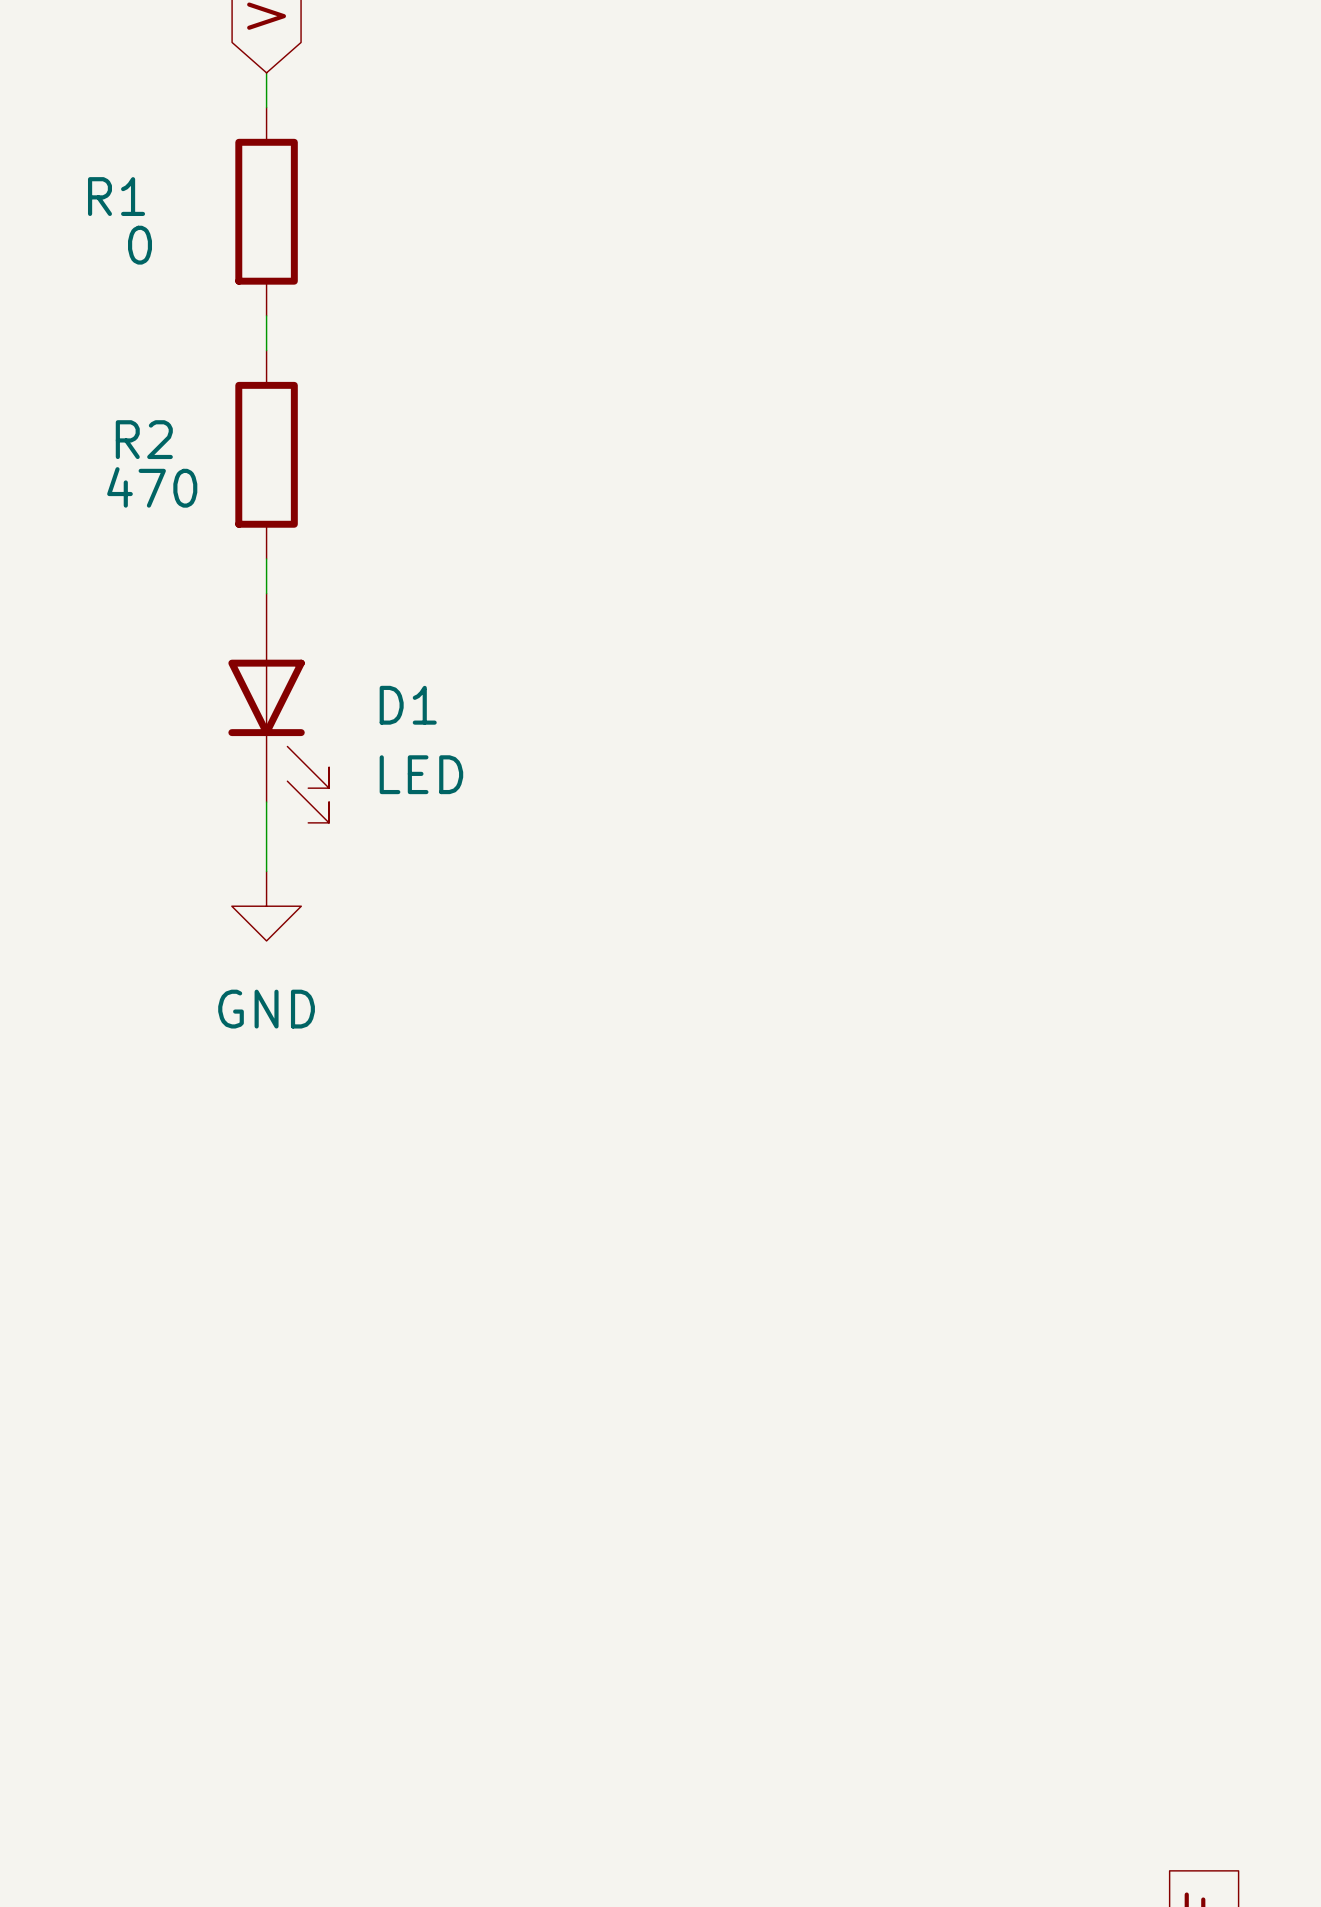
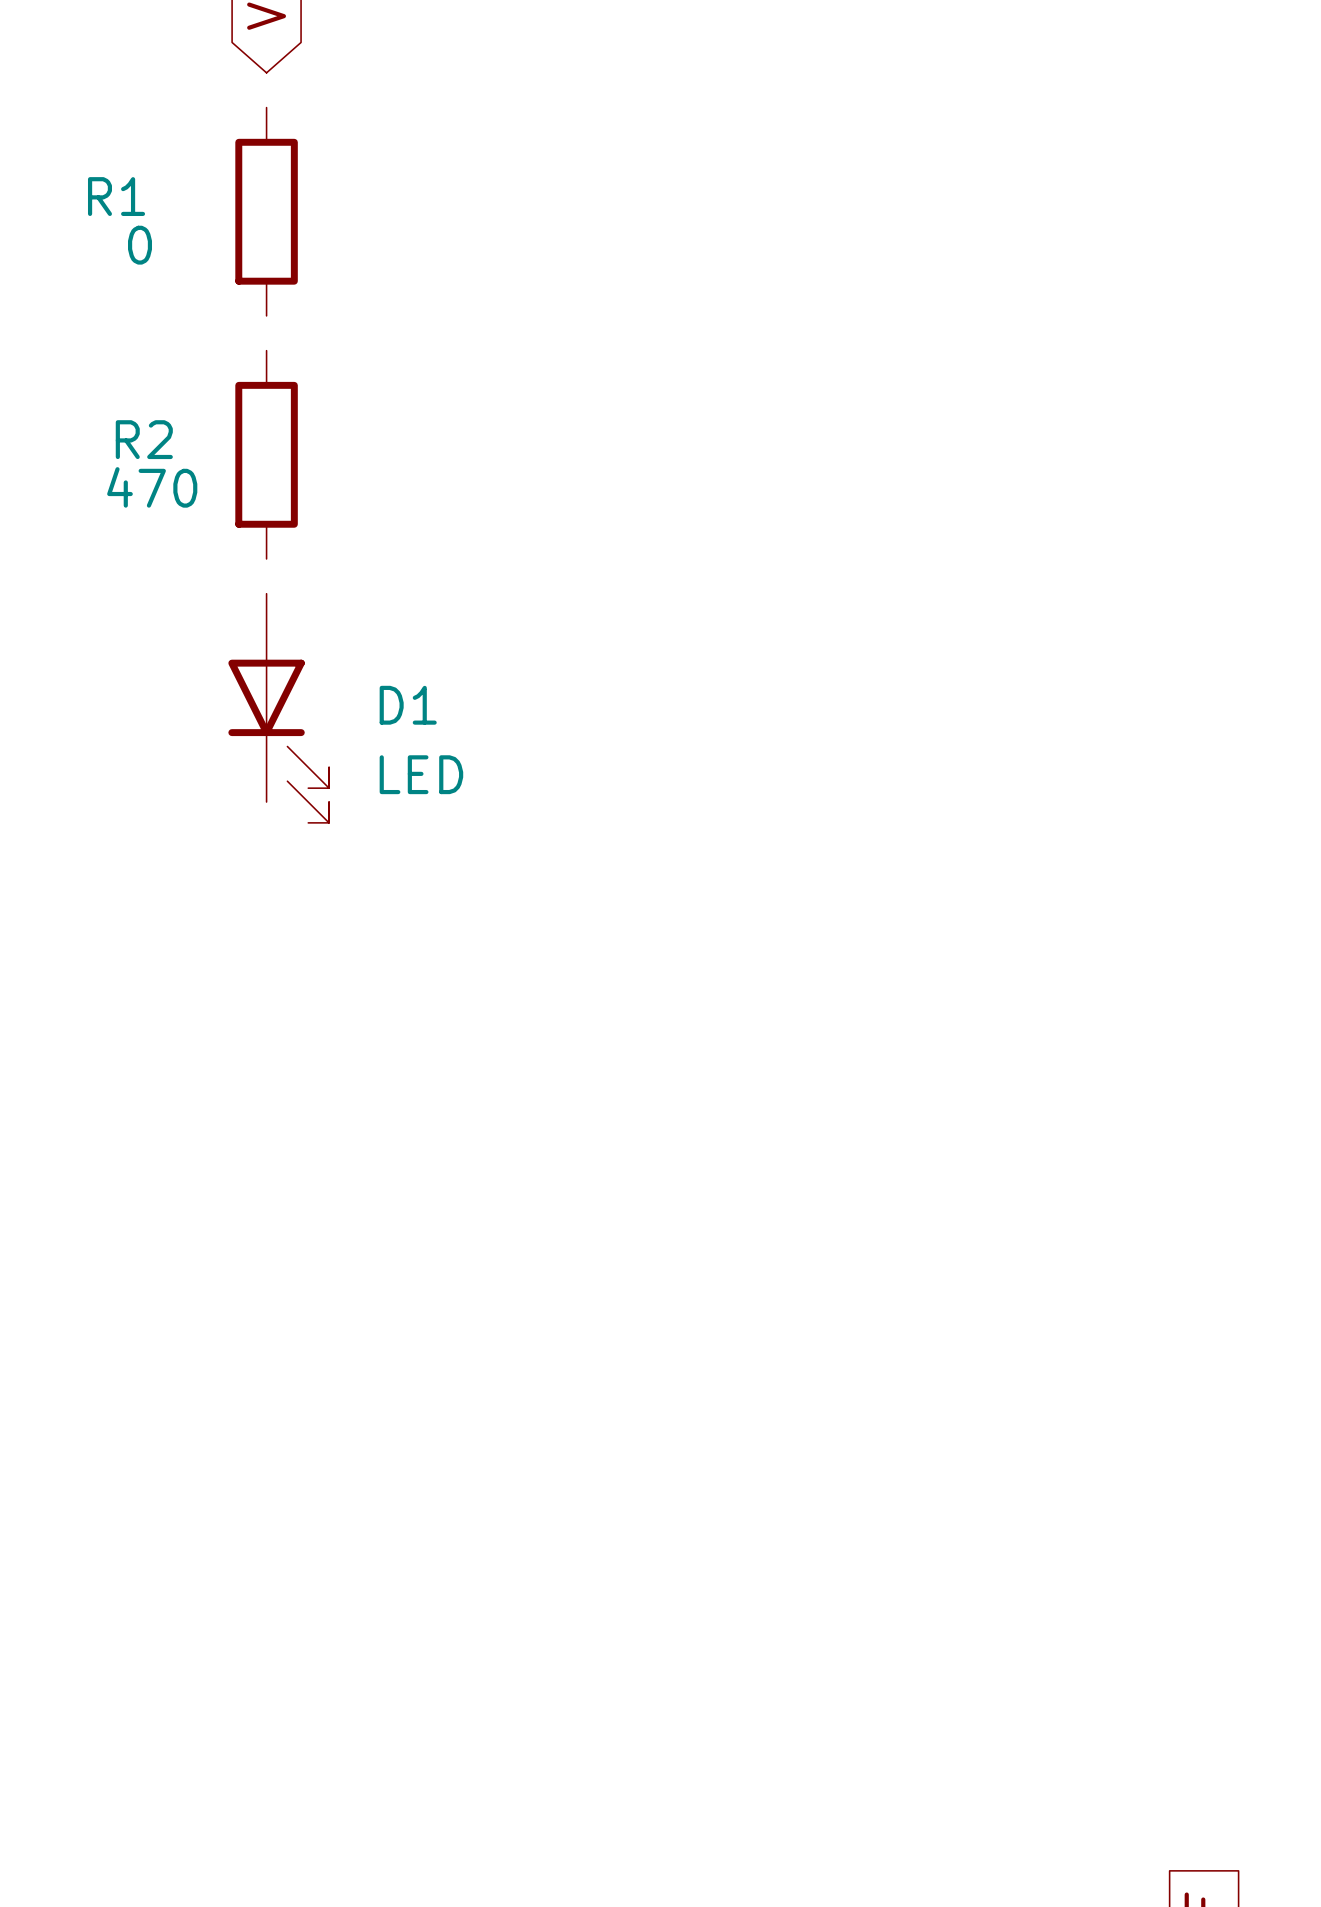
wire: (266, 72) (266, 107) -> none
wire: (266, 315) (266, 350) -> none
wire: (266, 558) (266, 593) -> none
wire: (266, 802) (266, 871) -> none
power symbol: GND (266, 906) -> none

